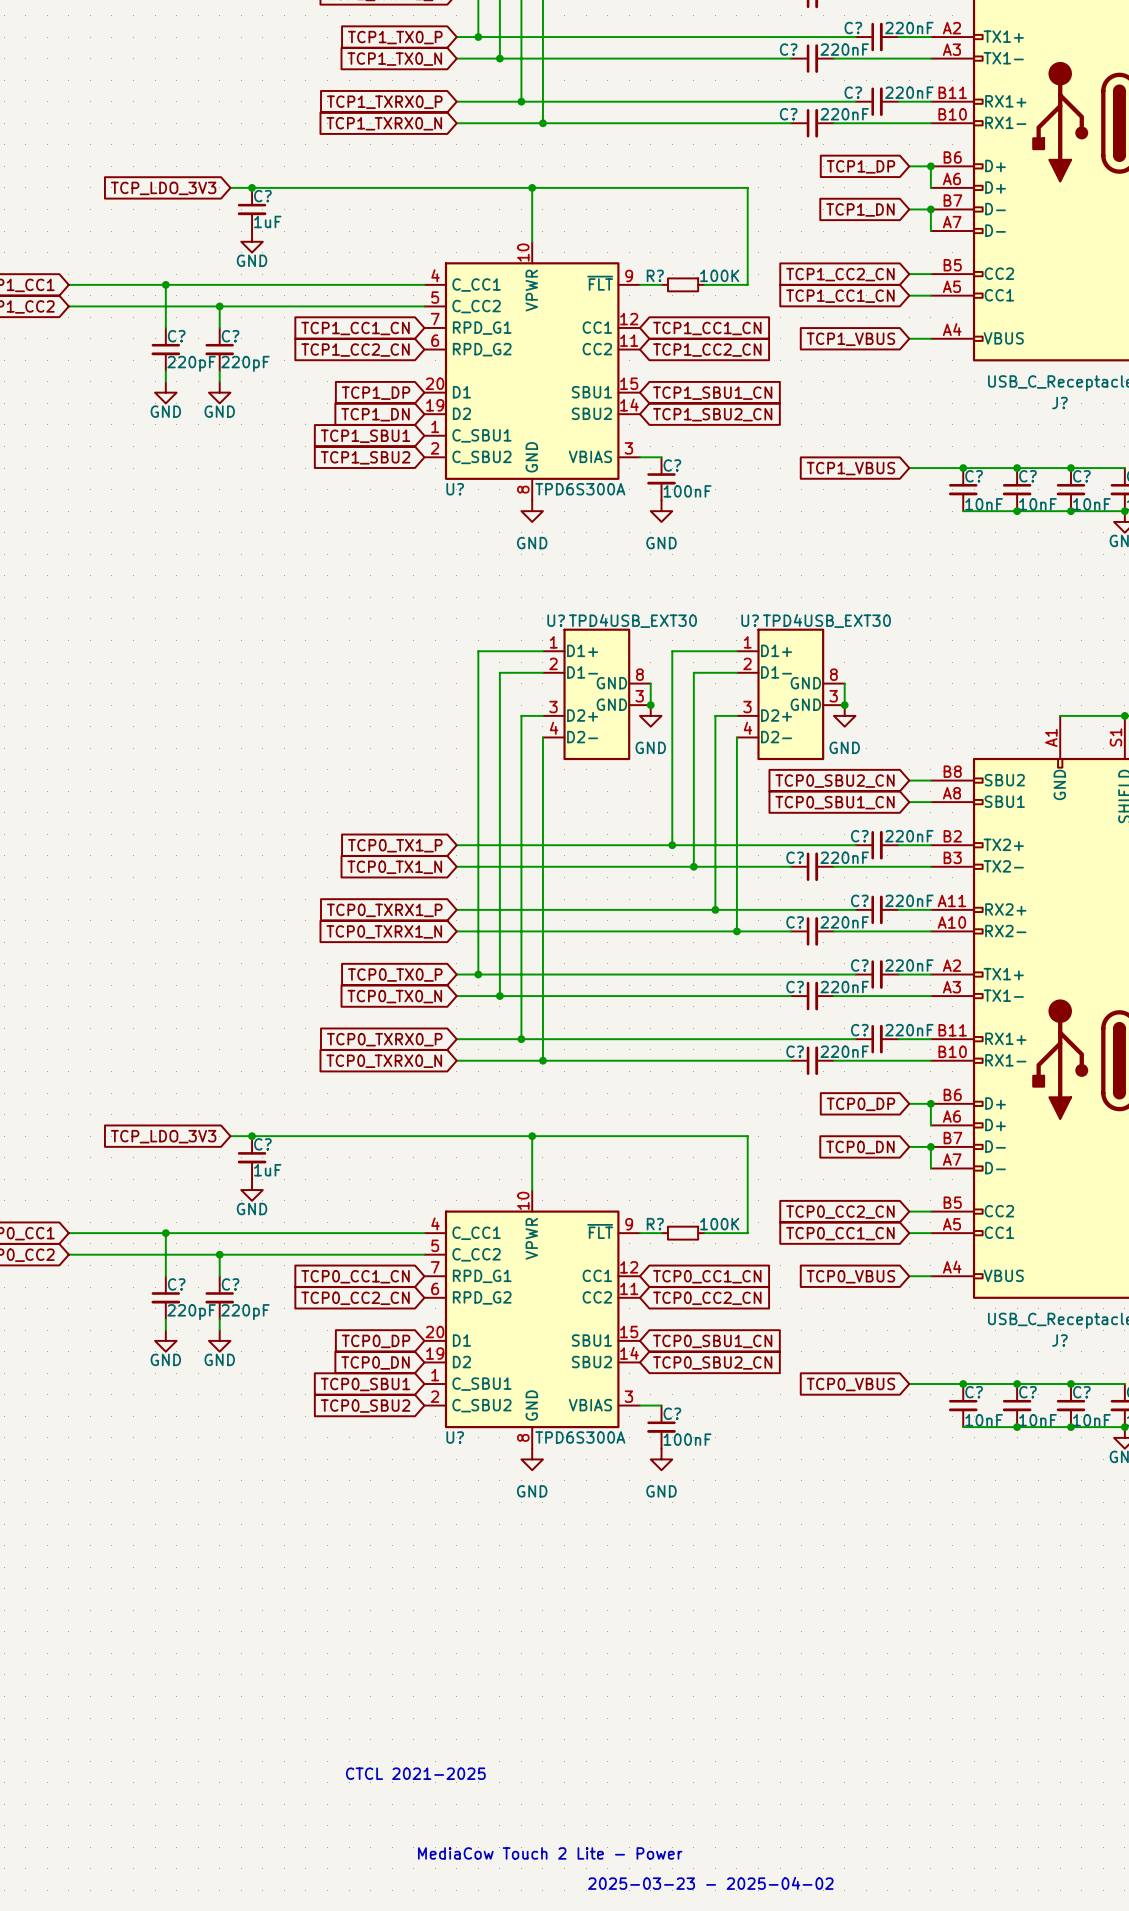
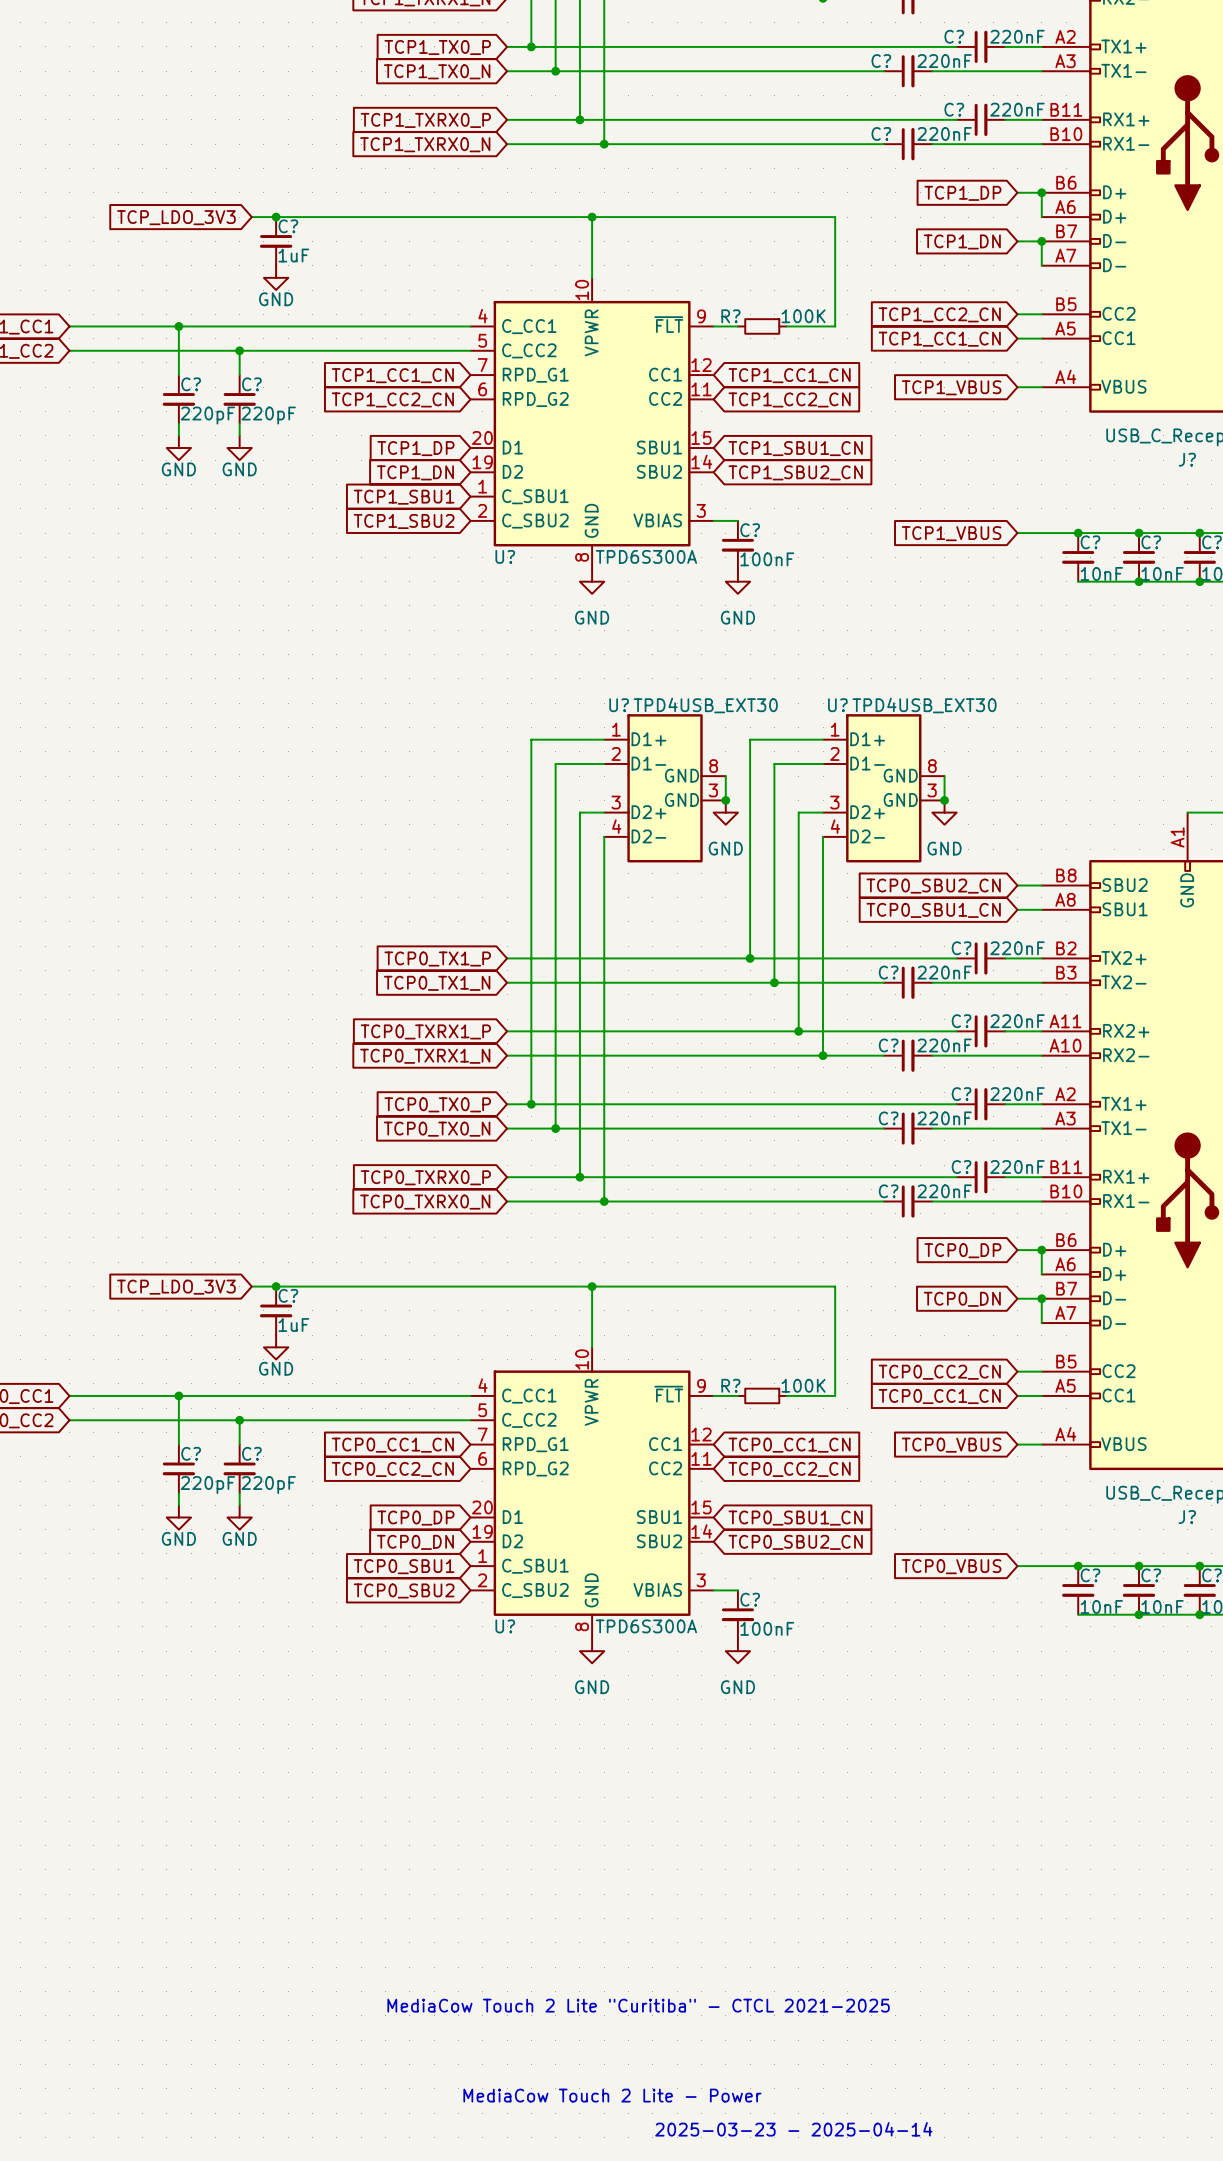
text: CTCL 2021-2025 (415, 1773) -> none
text: none -> MediaCow Touch 2 Lite "Curitiba" - CTCL 2021-2025 (638, 2005)
text: 2025-03-23 - 2025-04-02 (710, 1883) -> 2025-03-23 - 2025-04-14 (793, 2129)

